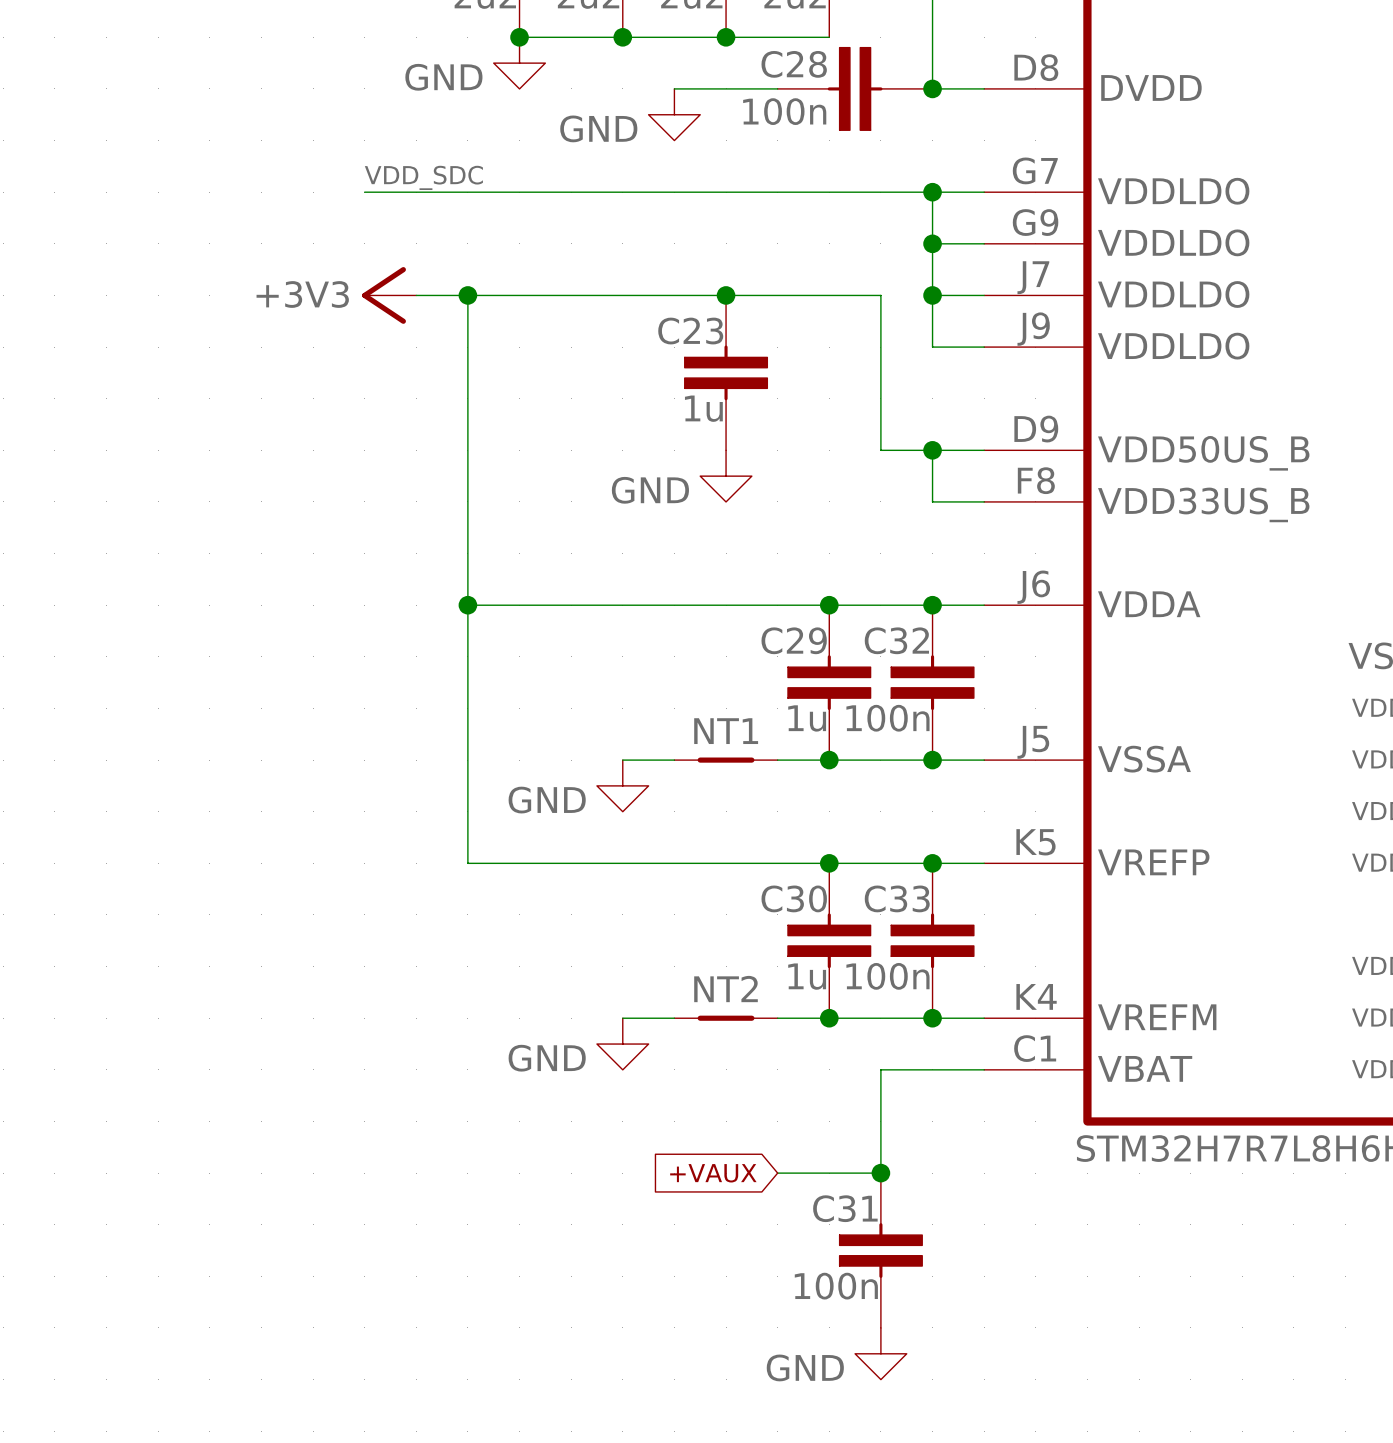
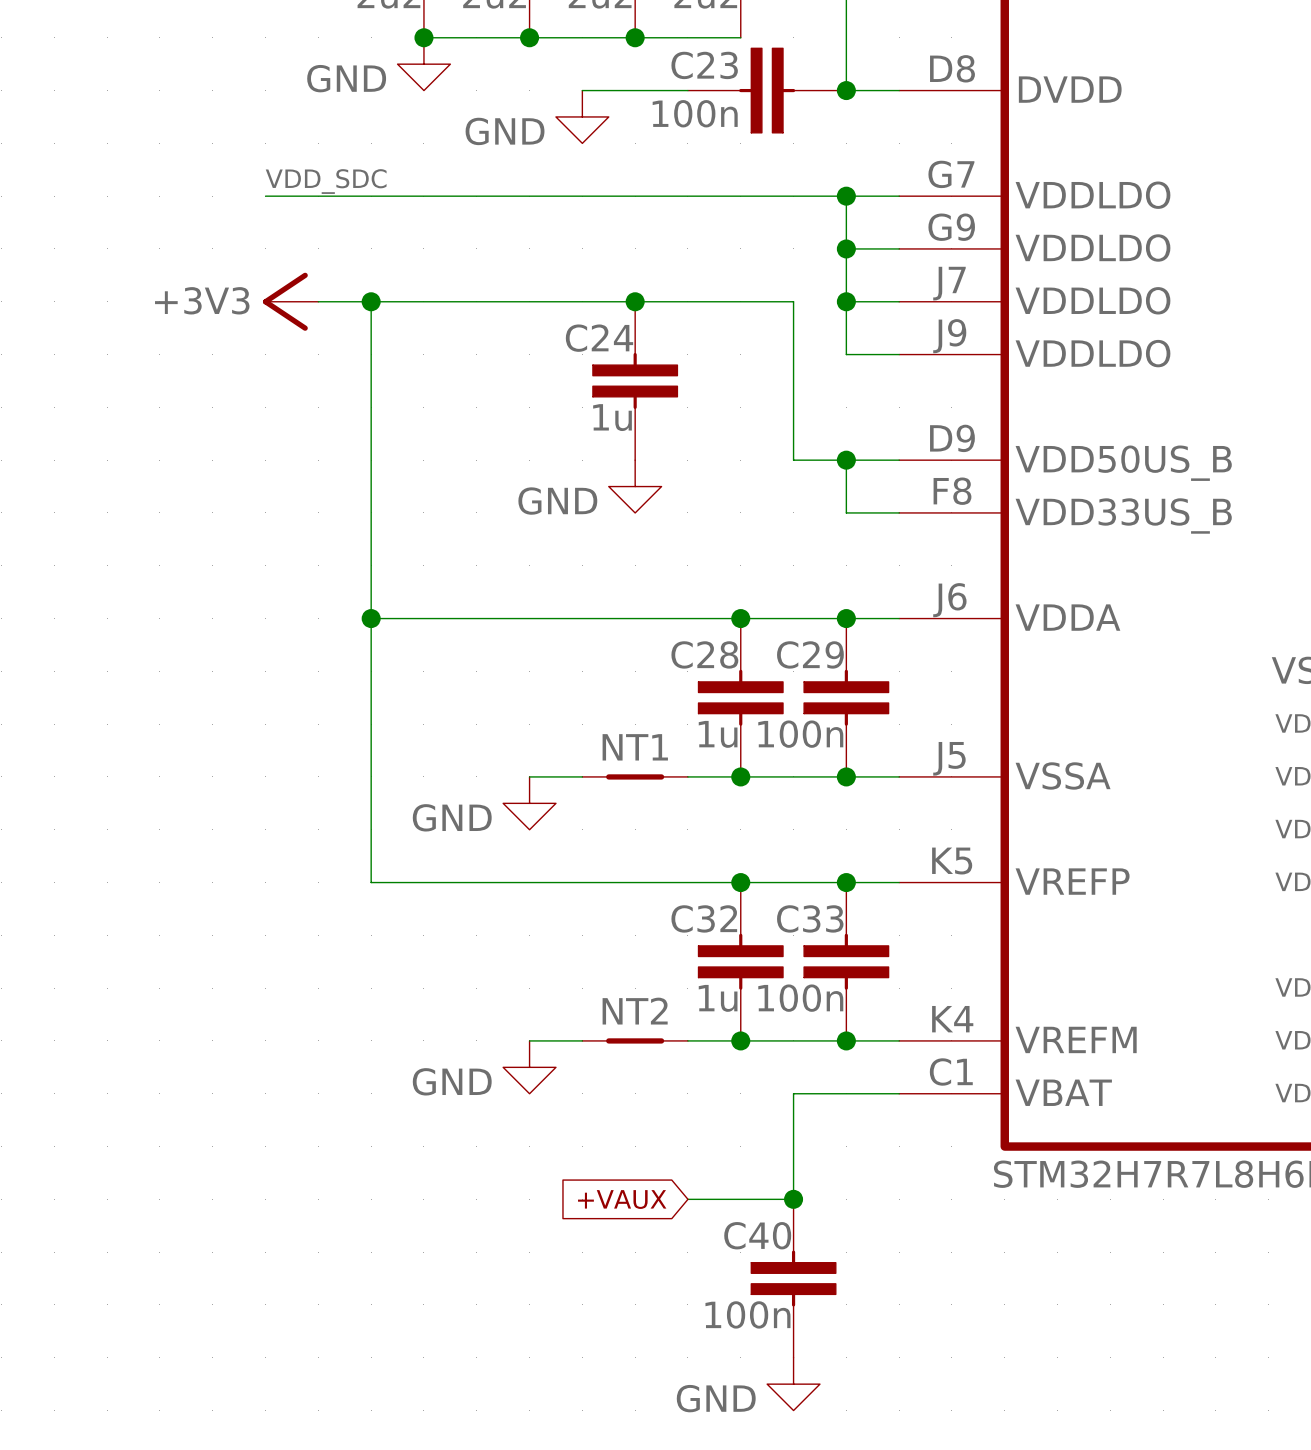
C28 name: C28 (794, 64) -> C23 (704, 65)
C23 name: C23 (690, 331) -> C24 (599, 338)
C29 name: C29 (794, 640) -> C28 (704, 654)
C32 name: C32 (896, 640) -> C29 (810, 654)
C30 name: C30 (794, 898) -> C32 (704, 918)
C31 name: C31 (845, 1208) -> C40 (757, 1235)

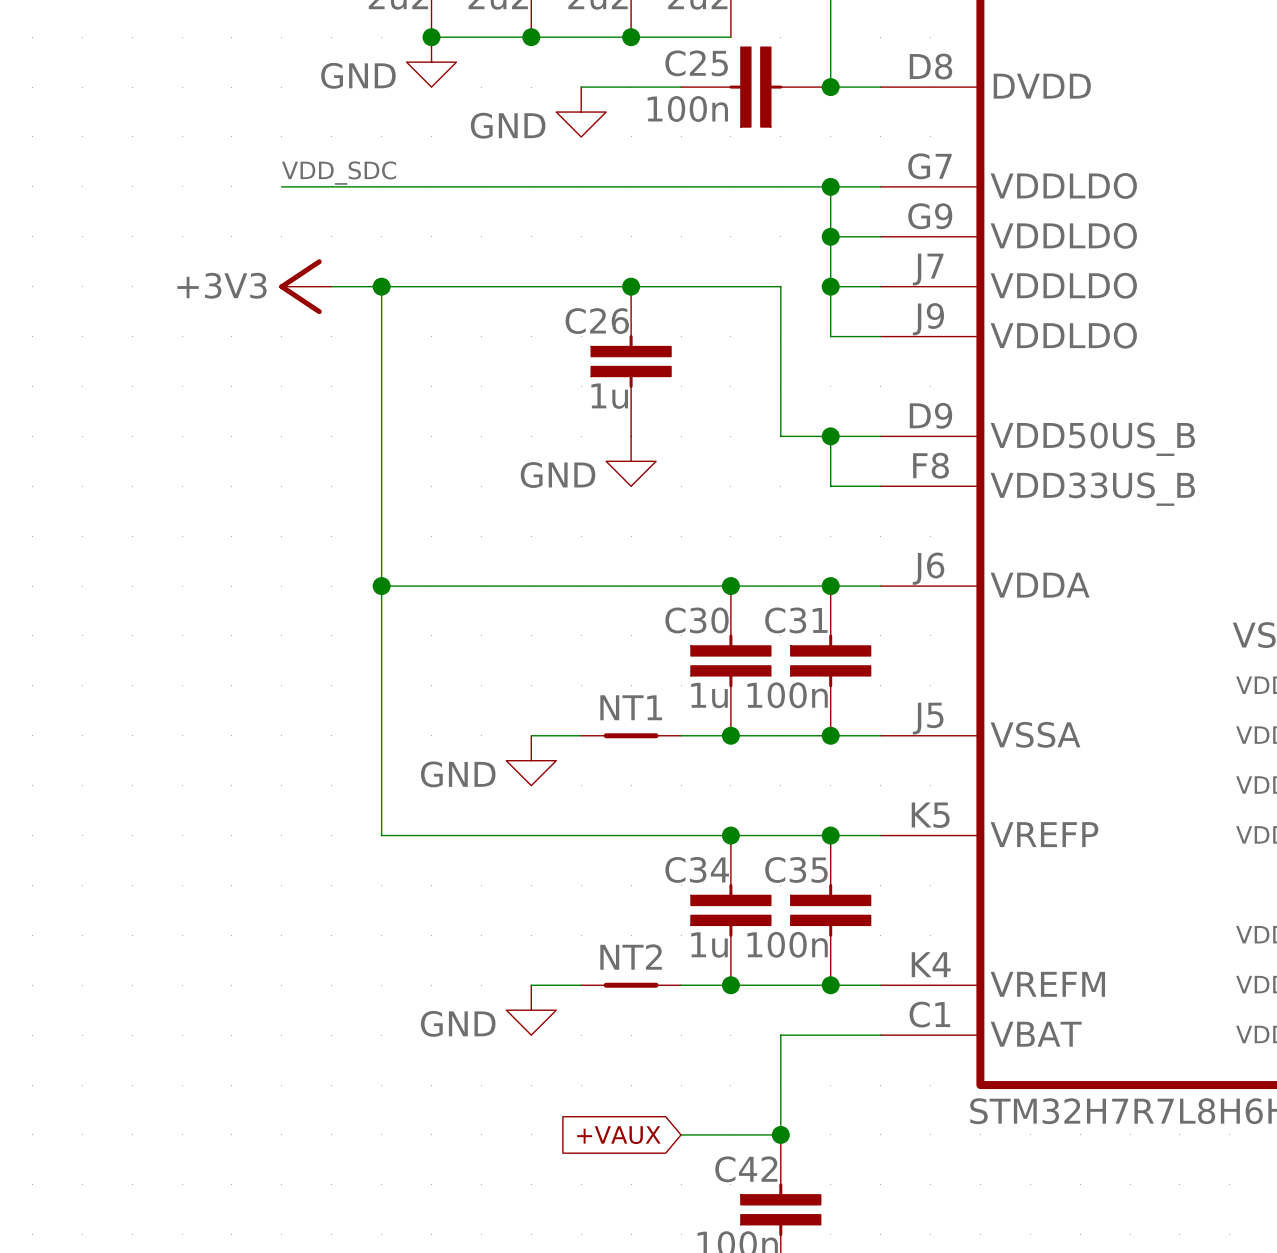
C23 name: C23 (704, 65) -> C25 (696, 63)
C24 name: C24 (599, 338) -> C26 (597, 321)
C28 name: C28 (704, 654) -> C30 (697, 620)
C29 name: C29 (810, 654) -> C31 (796, 620)
C32 name: C32 (704, 918) -> C34 (697, 869)
C33 name: C33 (810, 918) -> C35 (796, 869)
C40 name: C40 (757, 1235) -> C42 (746, 1169)

